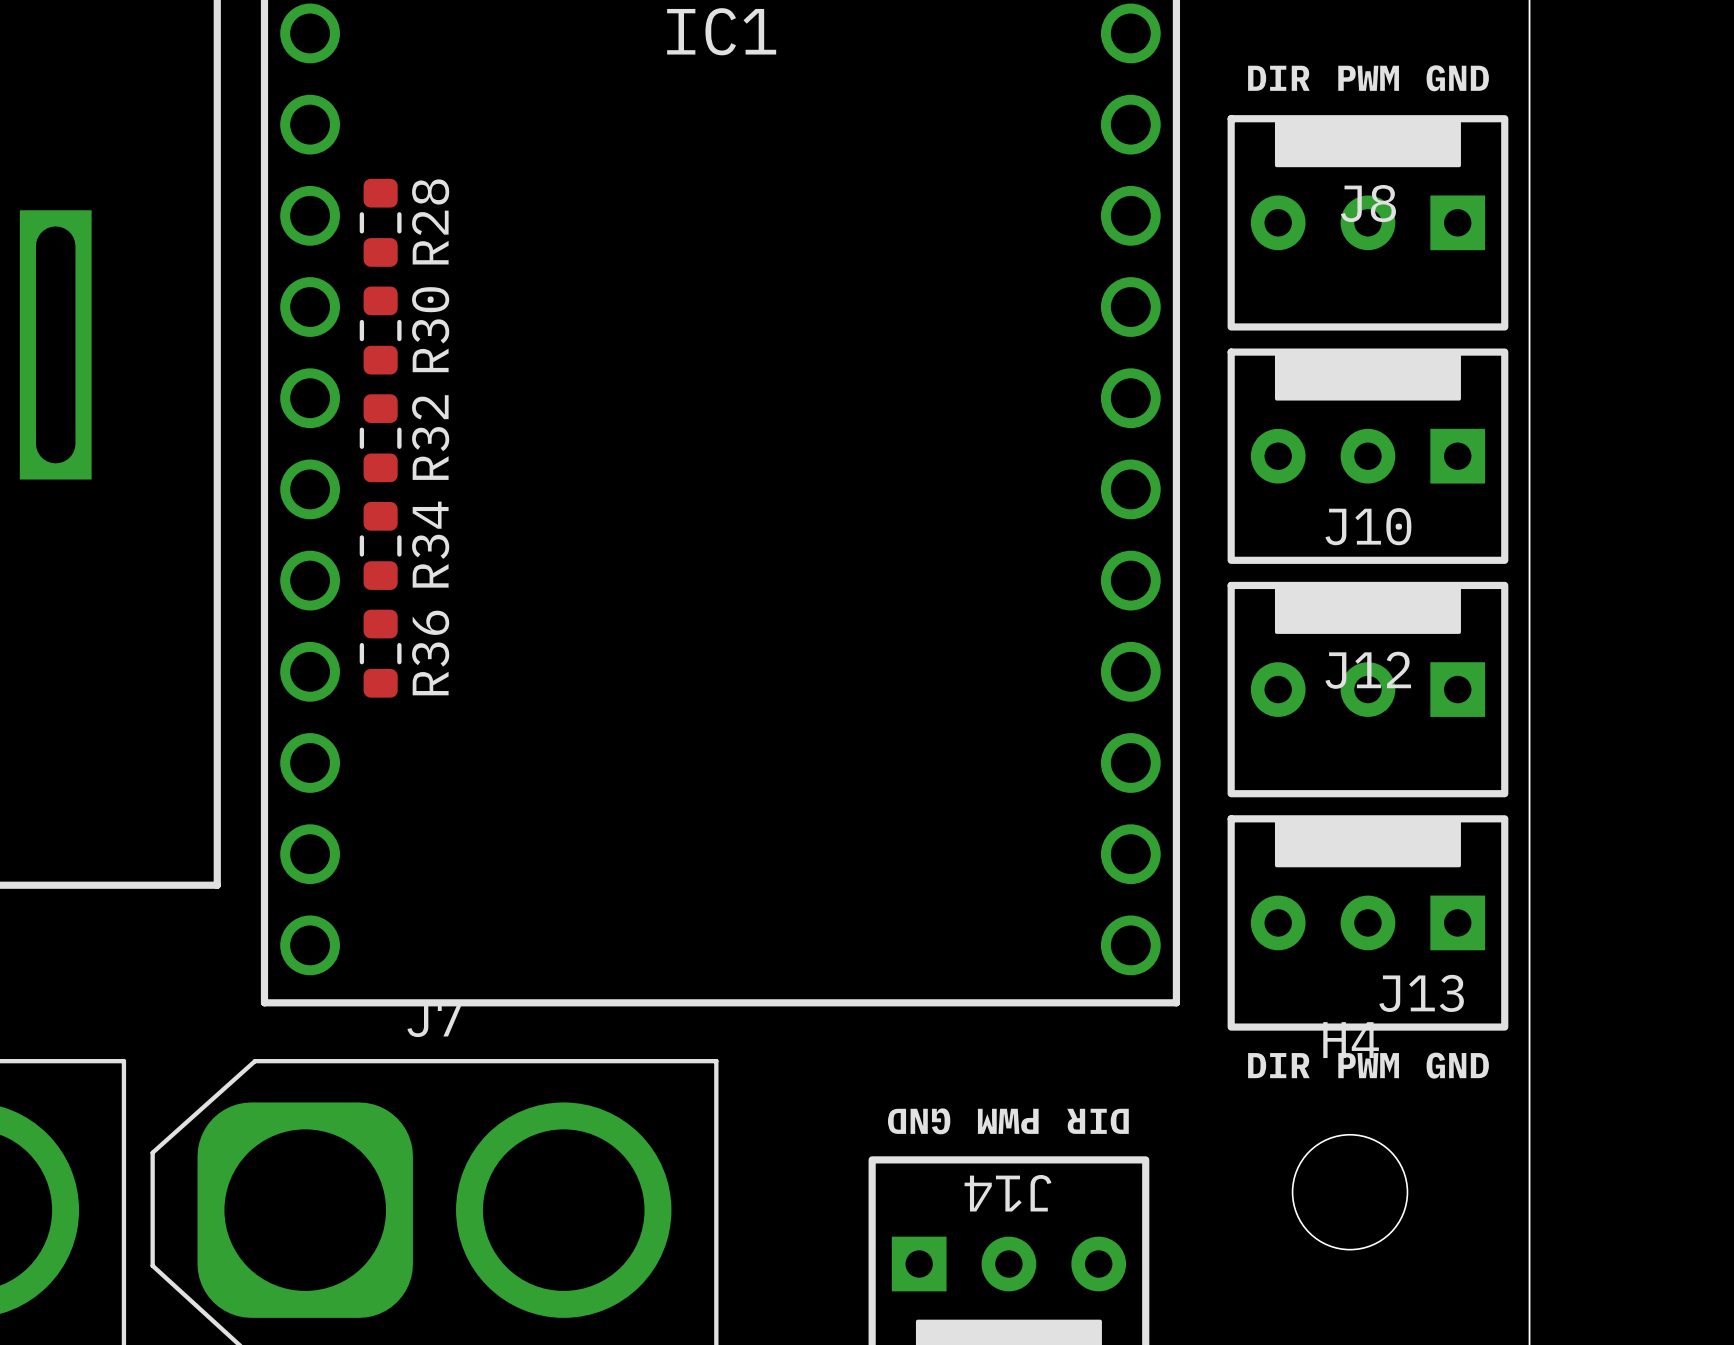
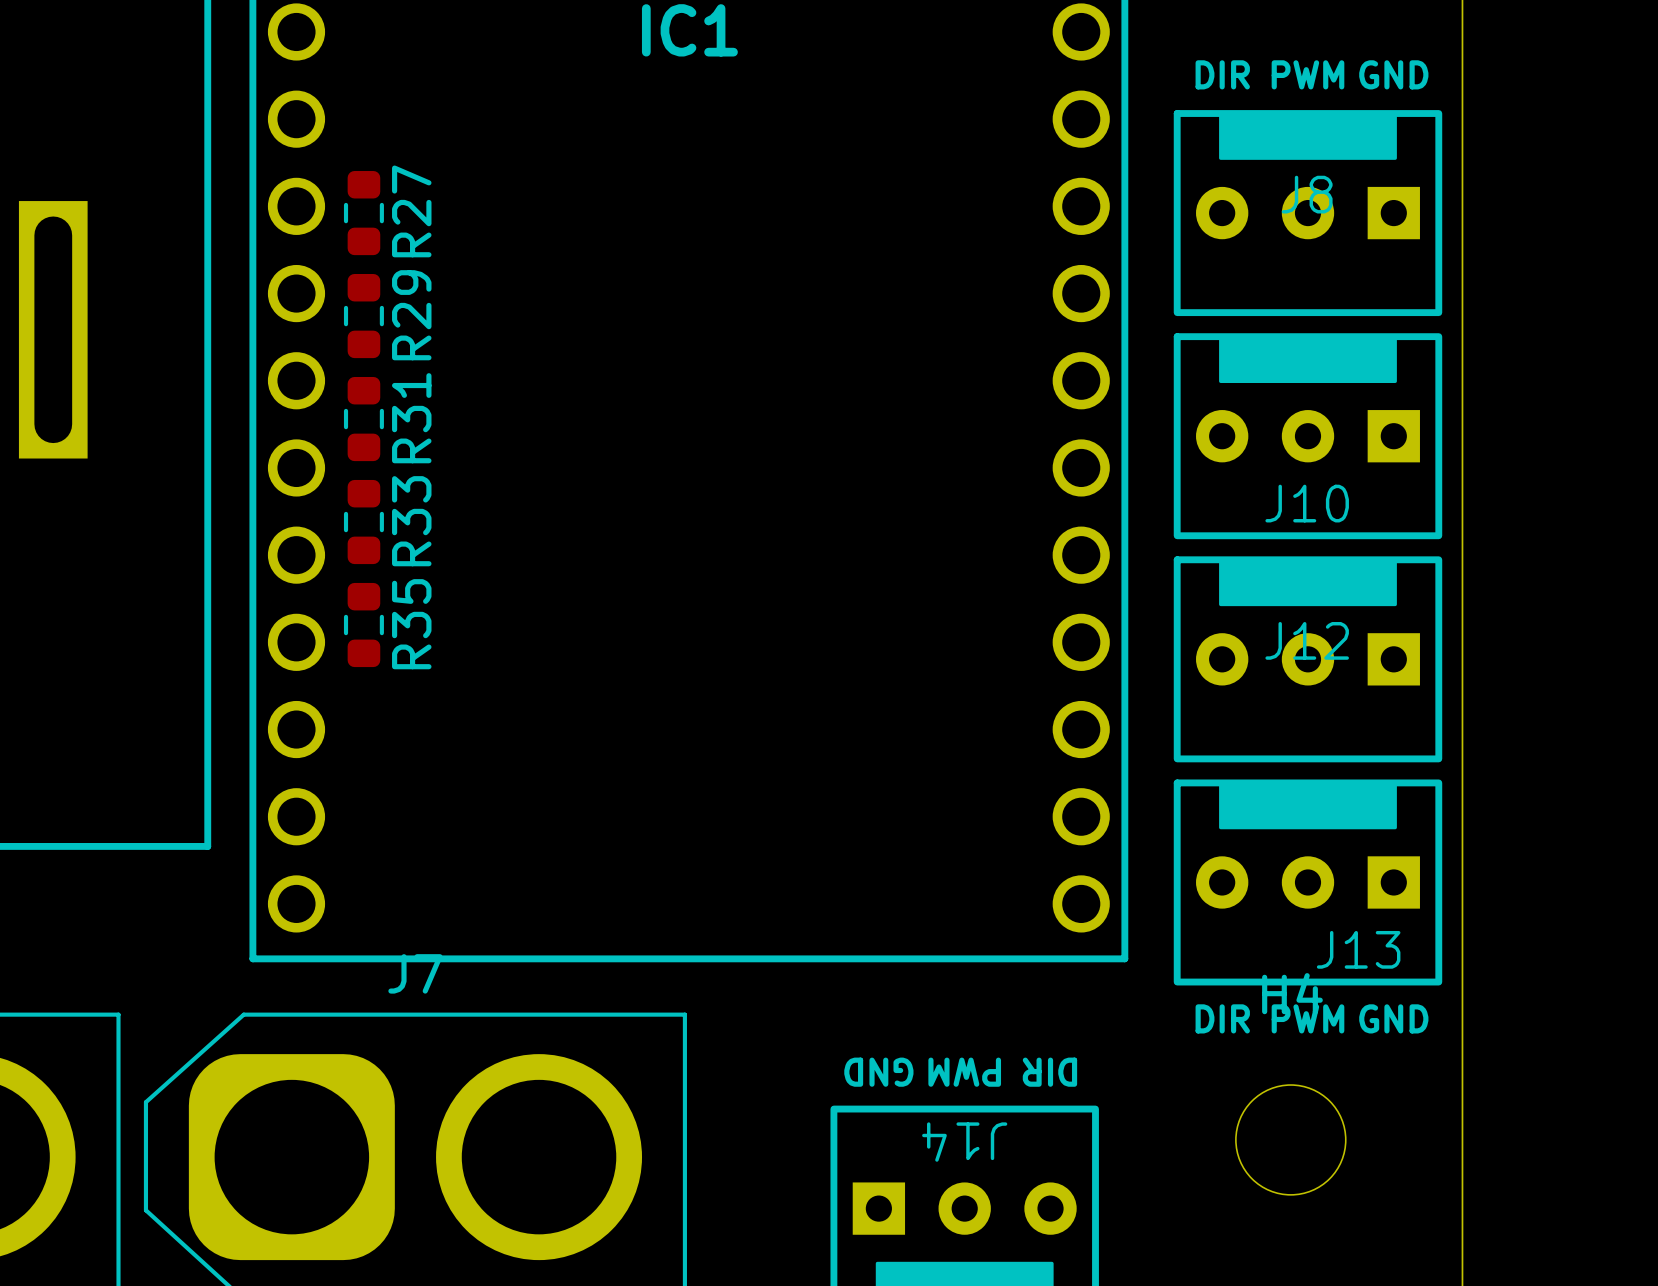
R28 name: R28 (430, 221) -> R27 (411, 211)
R30 name: R30 (430, 329) -> R29 (411, 315)
R32 name: R32 (430, 437) -> R31 (411, 418)
R34 name: R34 (430, 544) -> R33 (411, 521)
R36 name: R36 (430, 653) -> R35 (411, 624)

